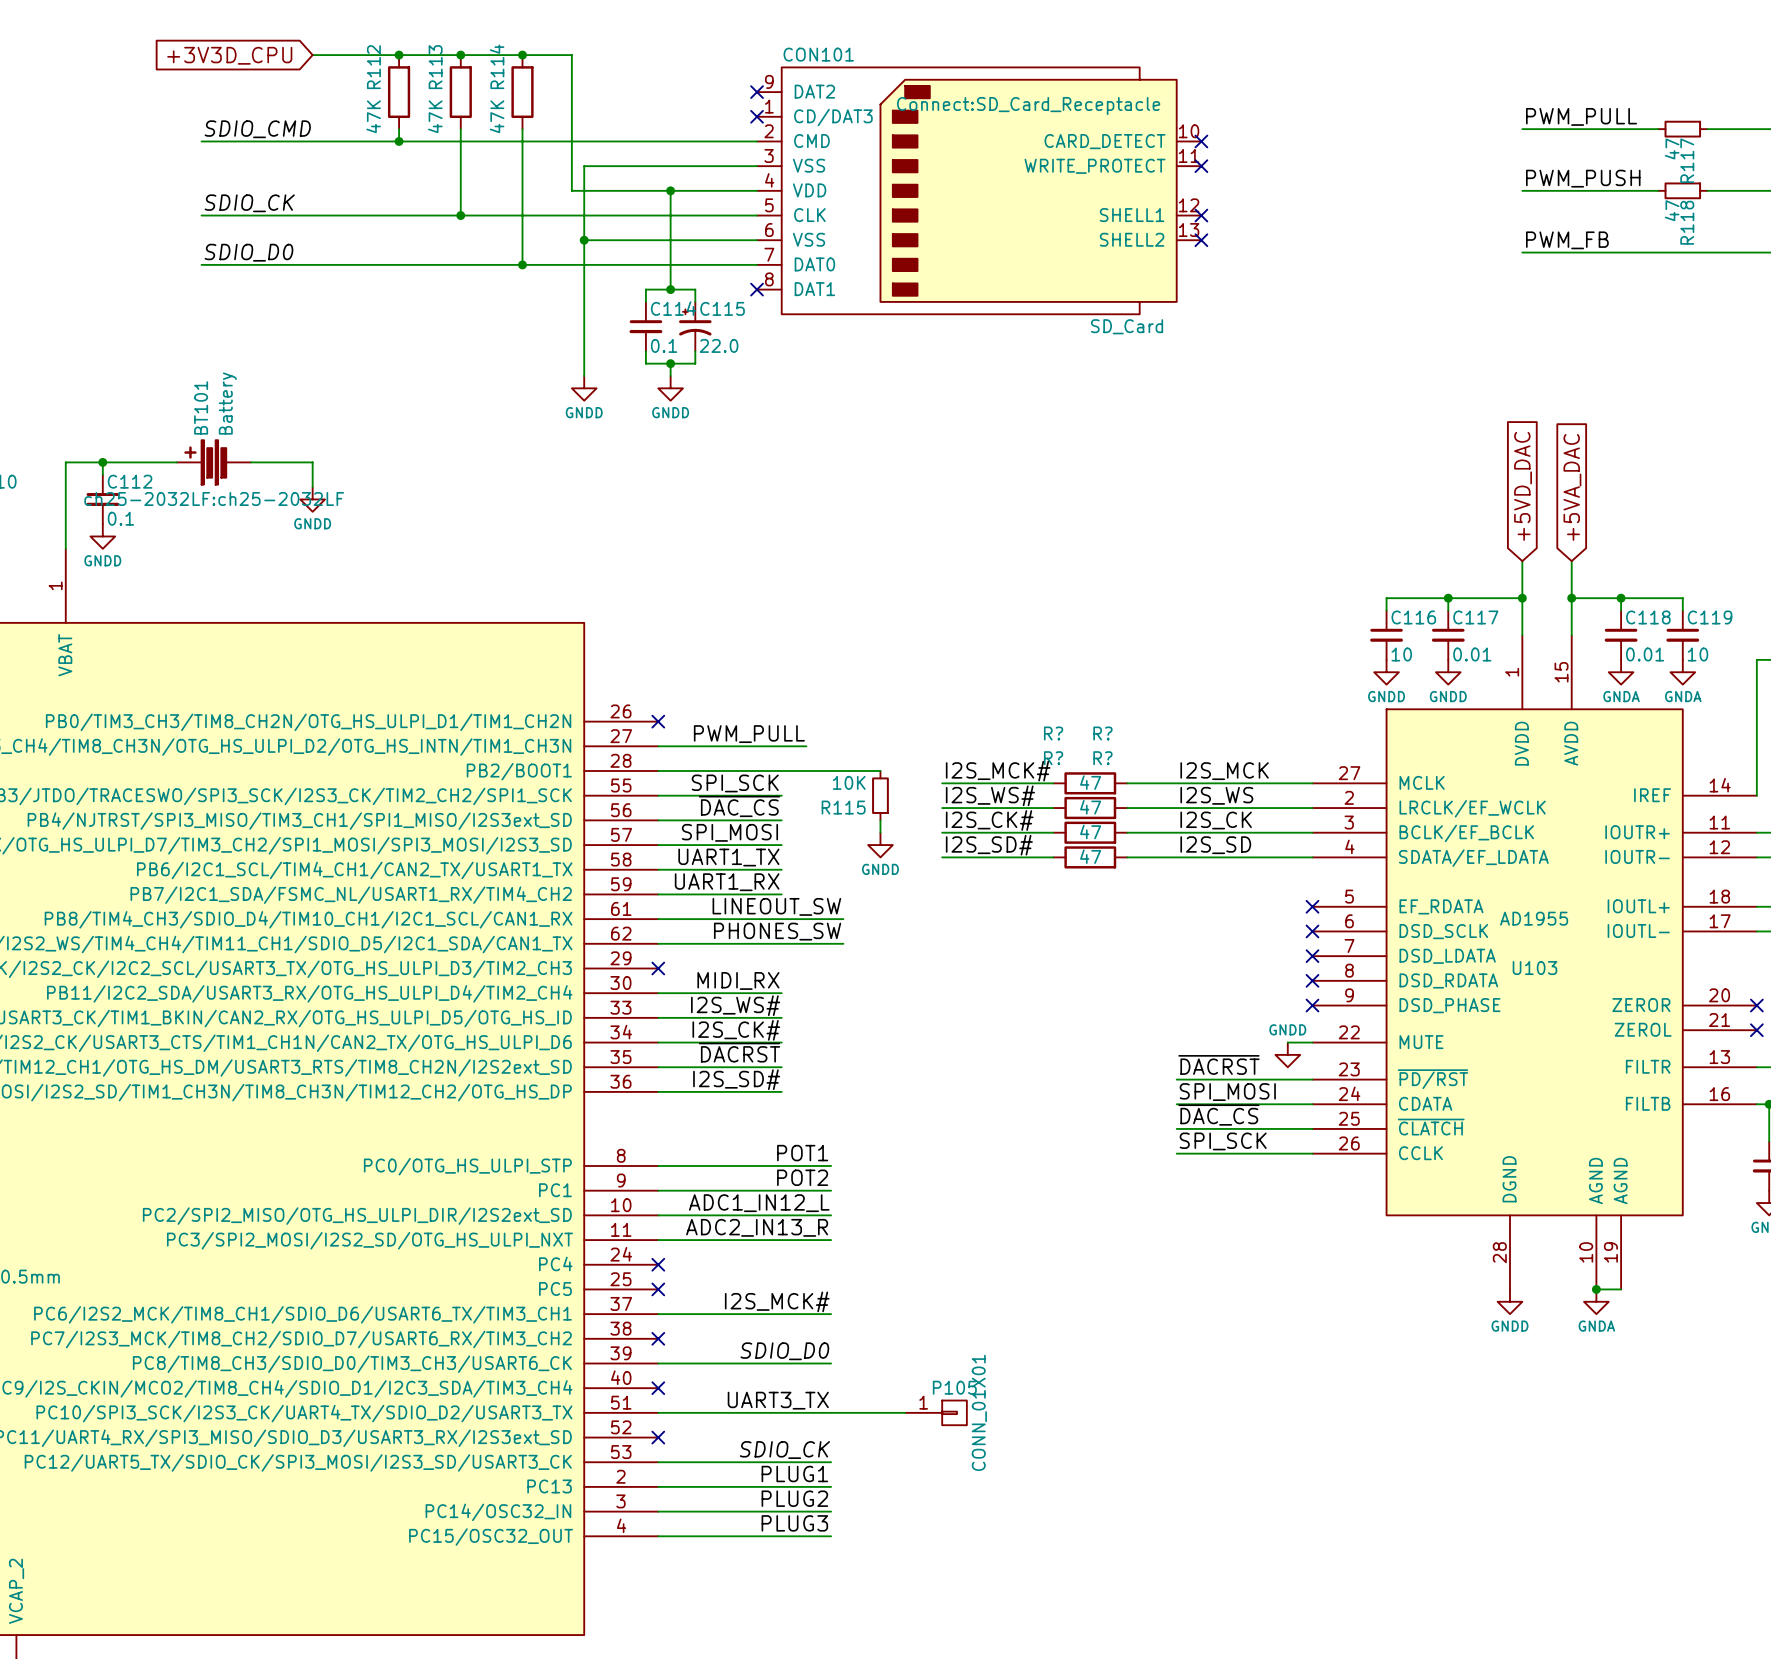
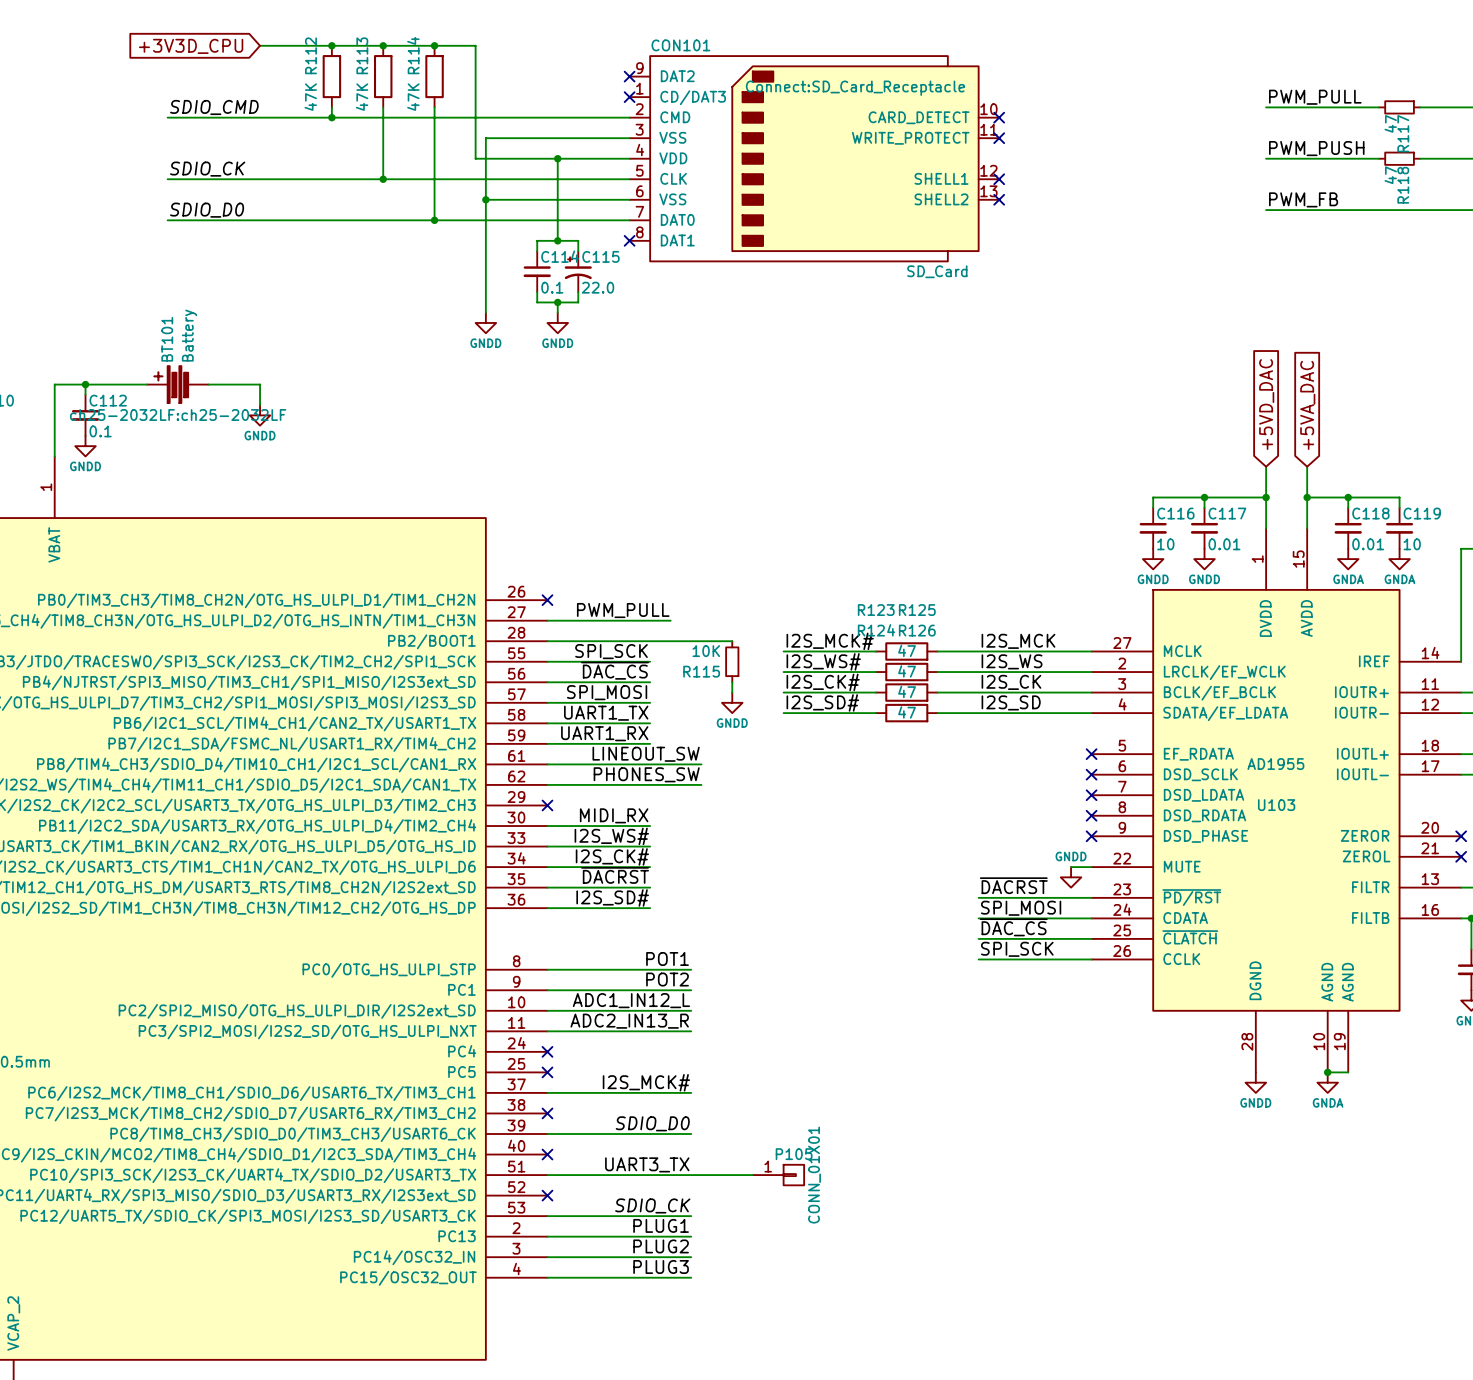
R? name: R? (1053, 733) -> R123 (876, 610)
R? name: R? (1102, 733) -> R125 (917, 610)
R? name: R? (1053, 758) -> R124 (876, 630)
R? name: R? (1102, 758) -> R126 (917, 630)

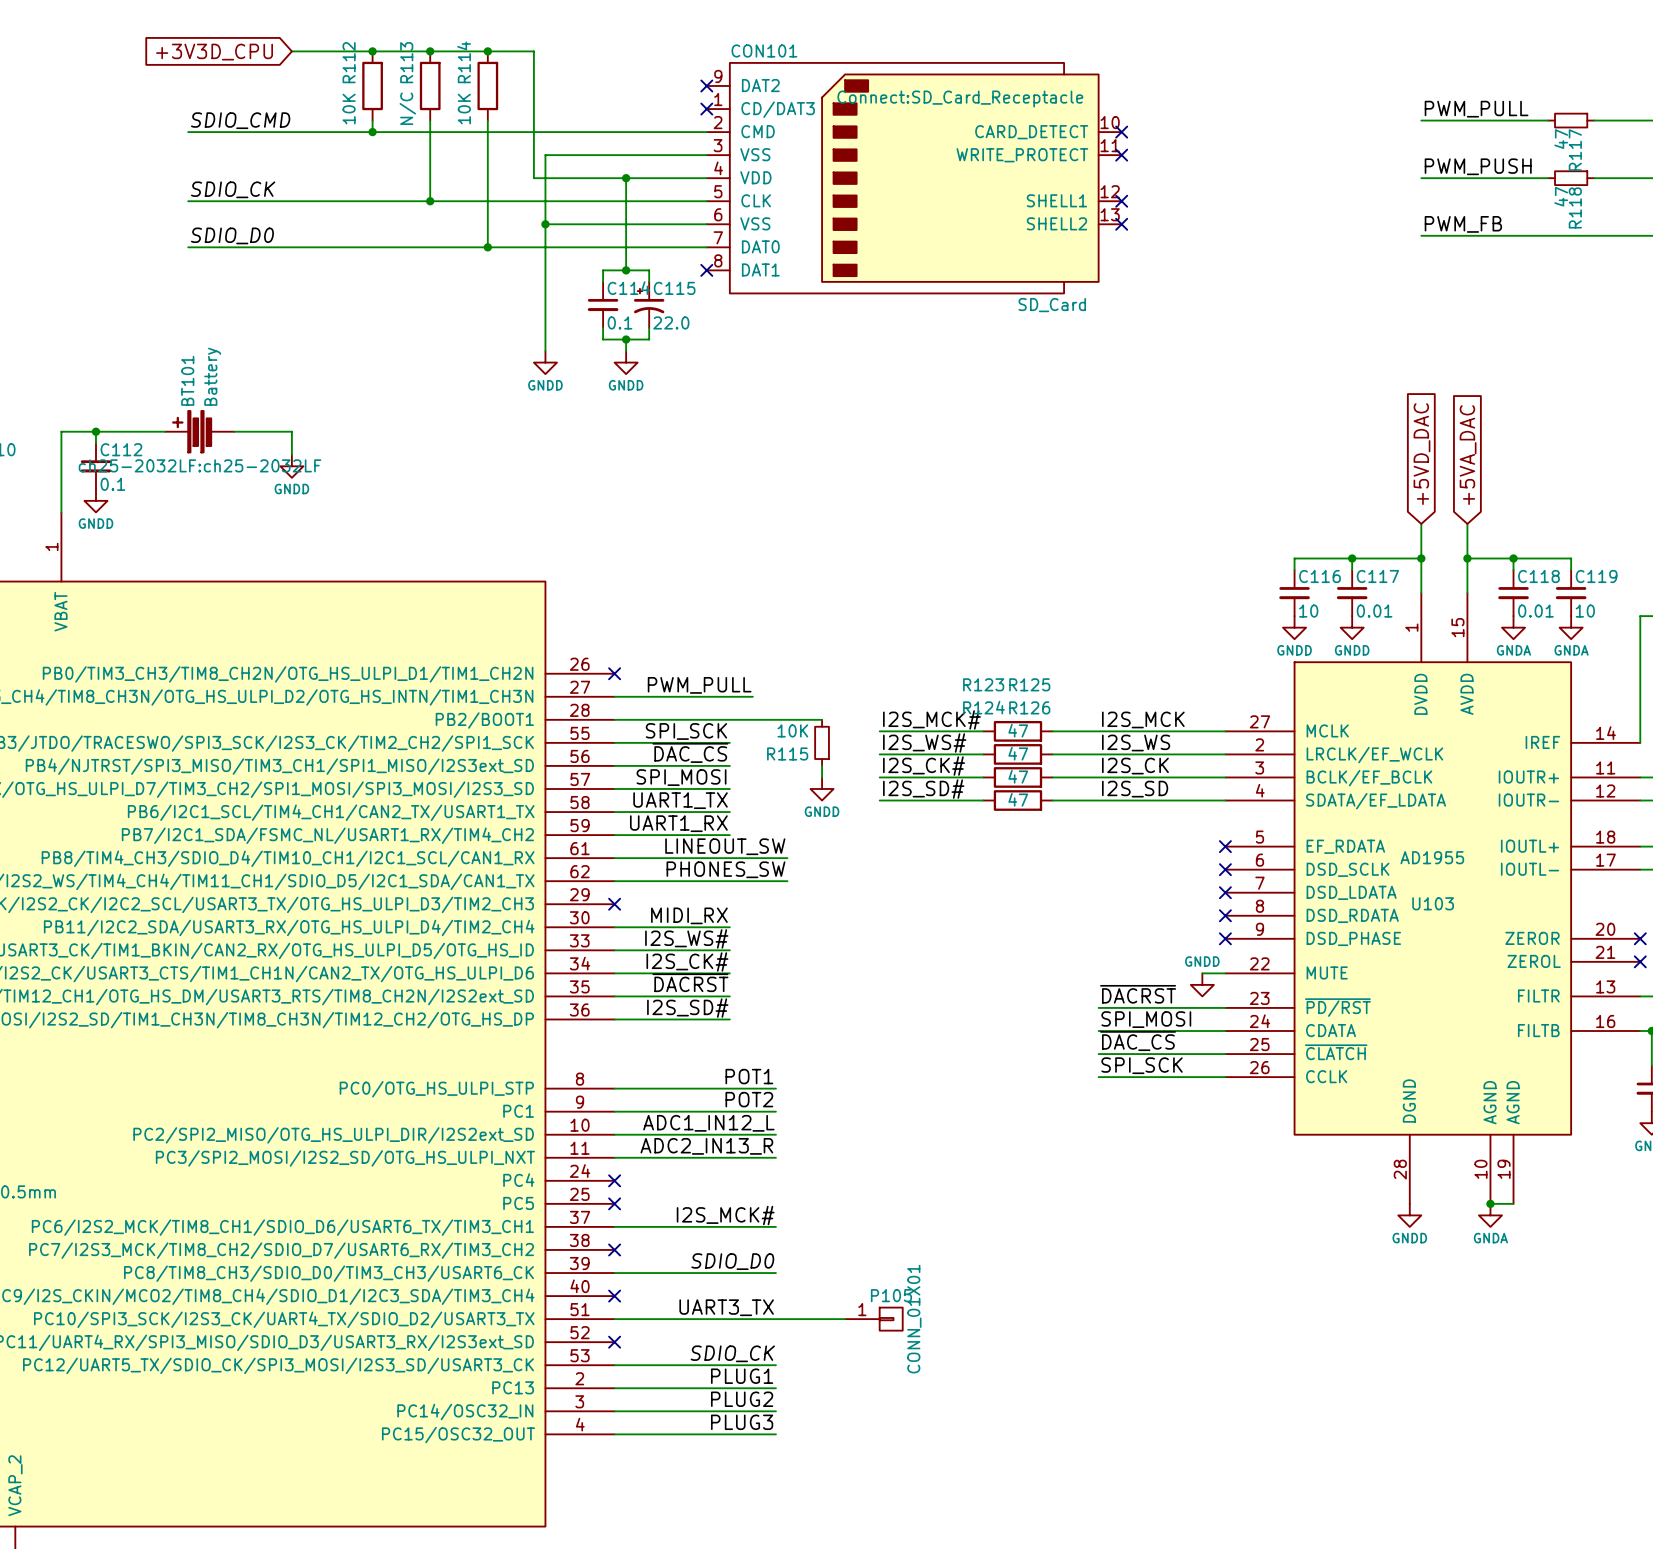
R112 value: 47K (310, 97) -> 10K (349, 109)
R113 value: 47K (362, 97) -> N/C (407, 108)
R114 value: 47K (413, 97) -> 10K (464, 109)

